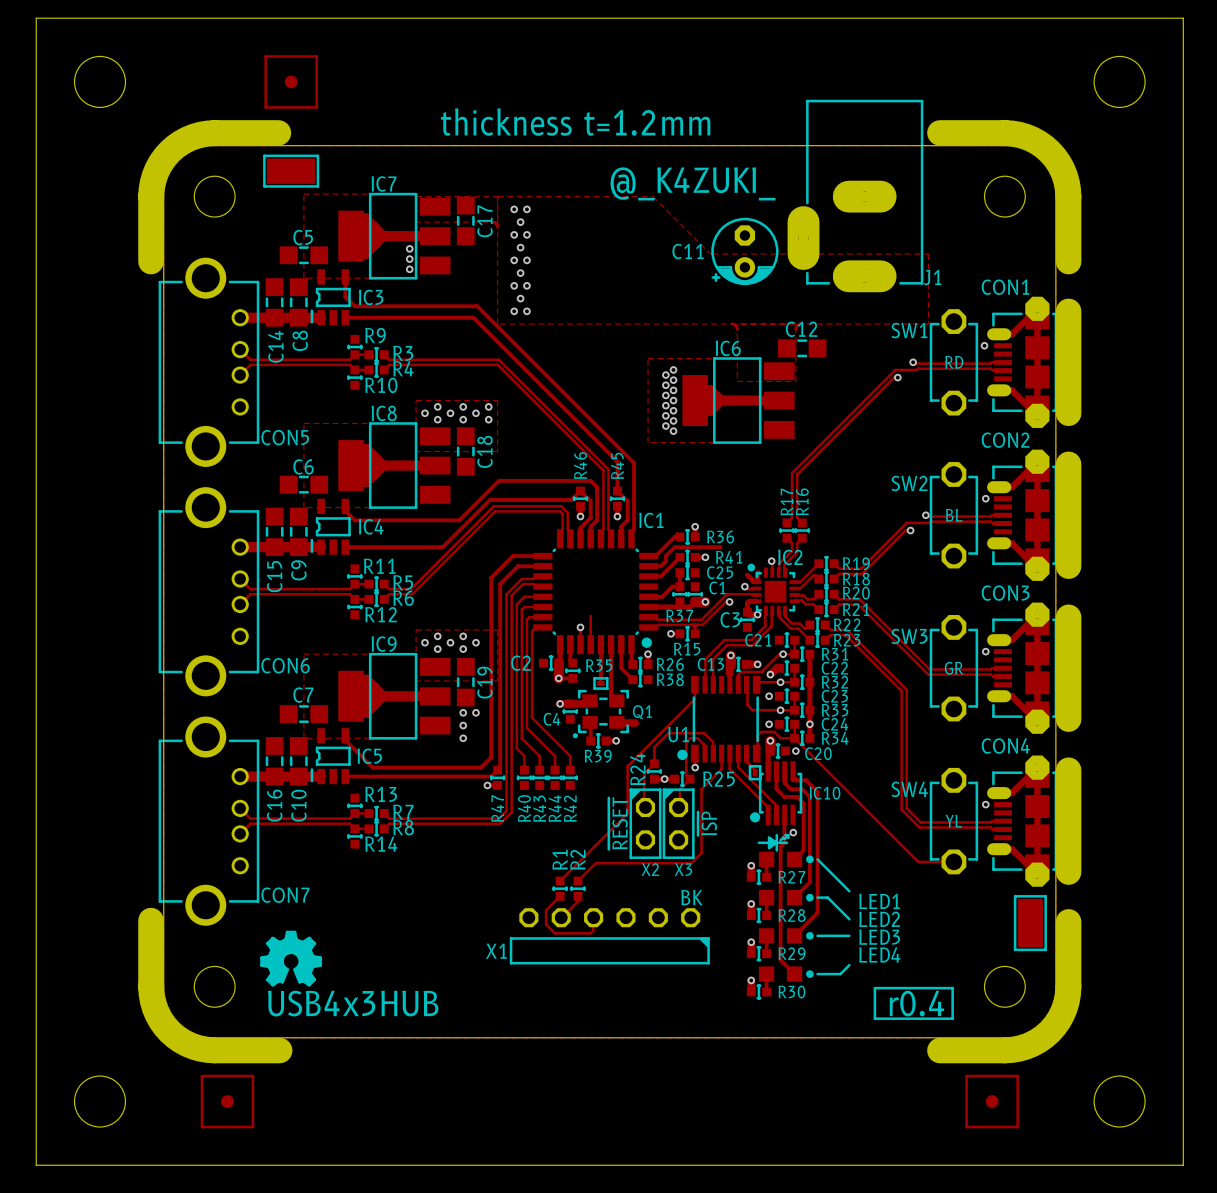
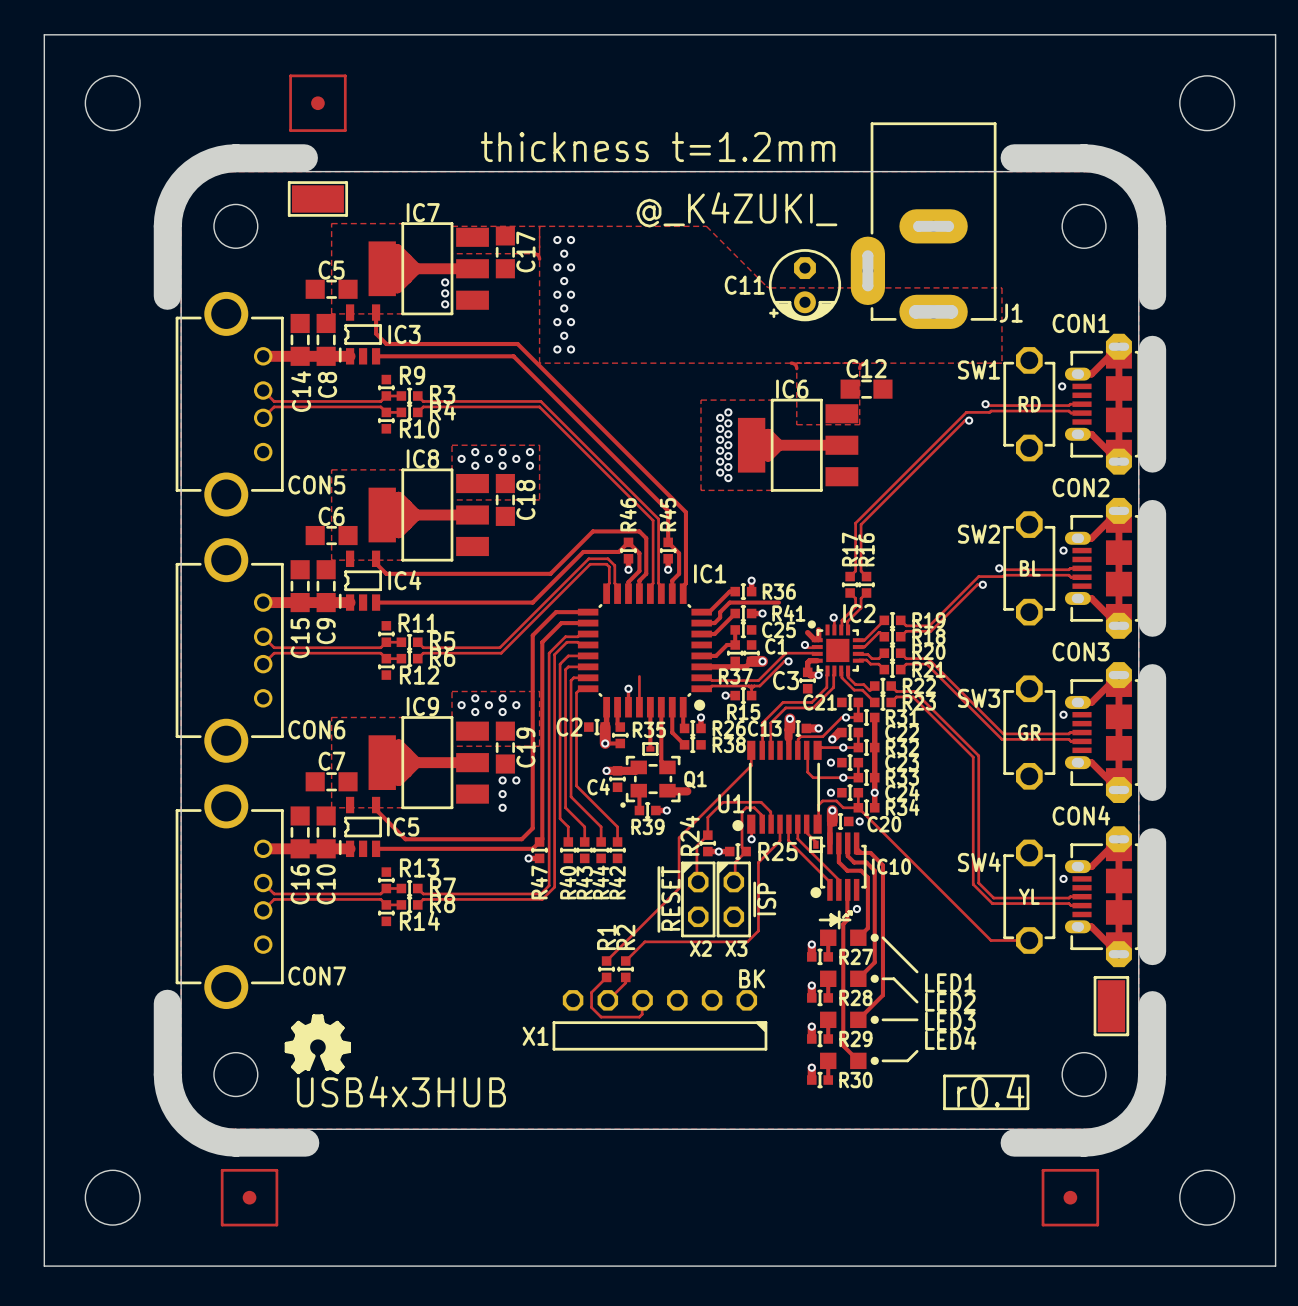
track: (547, 480) (498, 480) (459, 520) -> (592, 531) (550, 573) (498, 573)
track: (538, 499) (490, 499) (442, 547) -> (583, 551) (532, 602) (480, 602)
track: (543, 506) (493, 506) (410, 589) -> (588, 558) (499, 647) (446, 647)
track: (544, 511) (495, 511) (412, 594) -> (590, 564) (501, 653) (447, 653)

